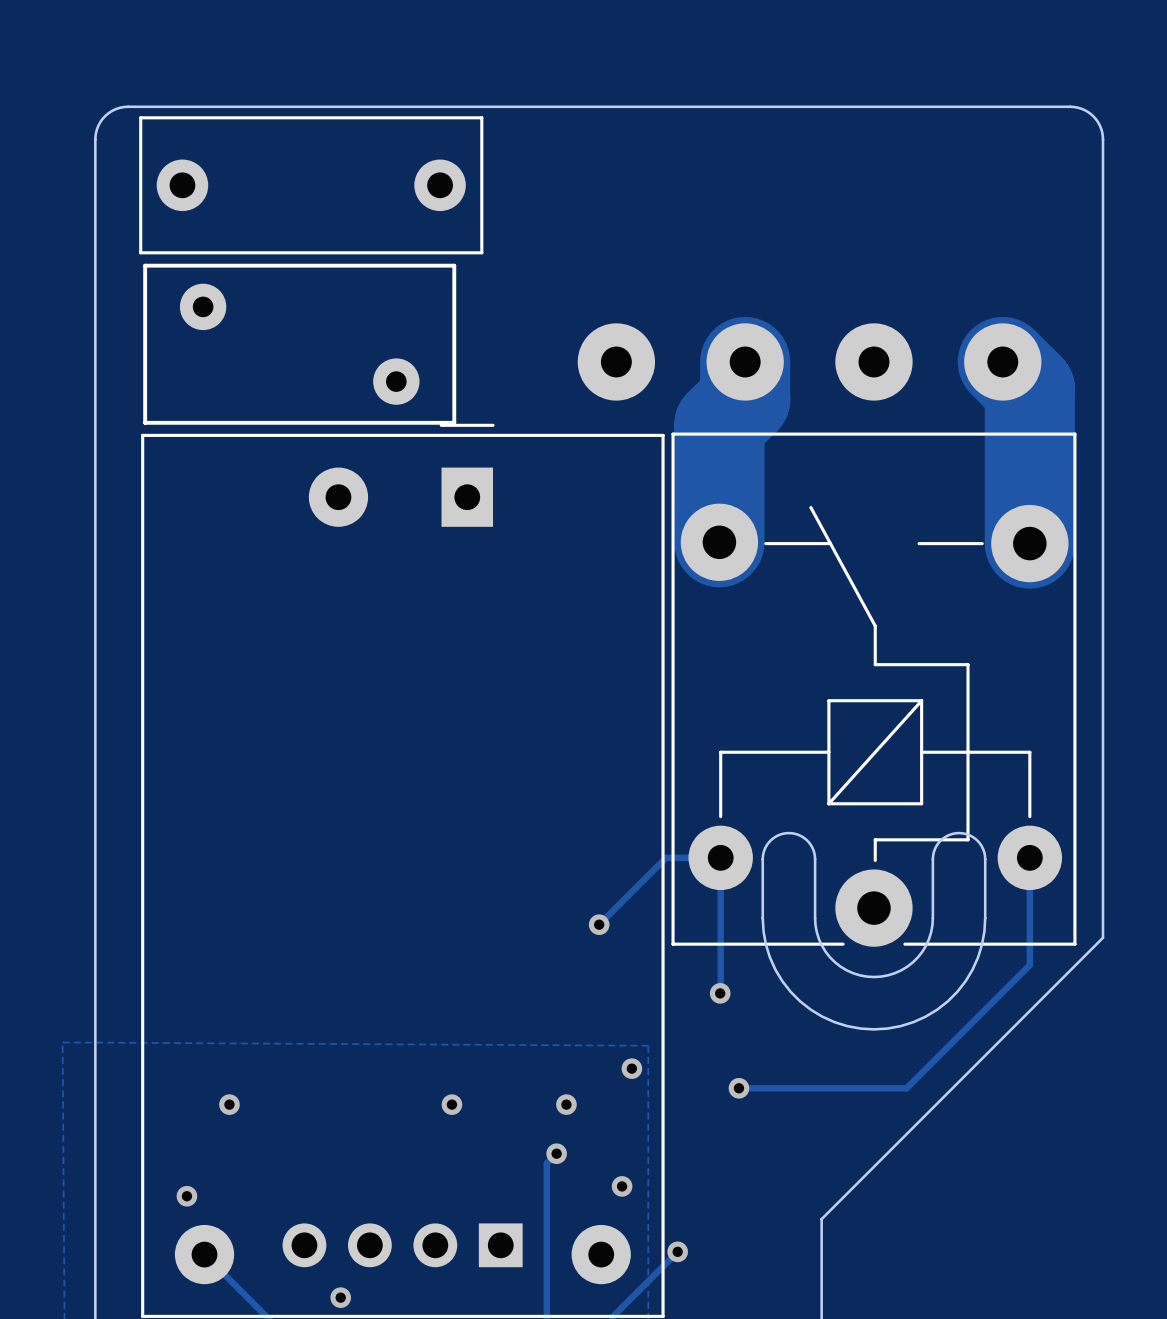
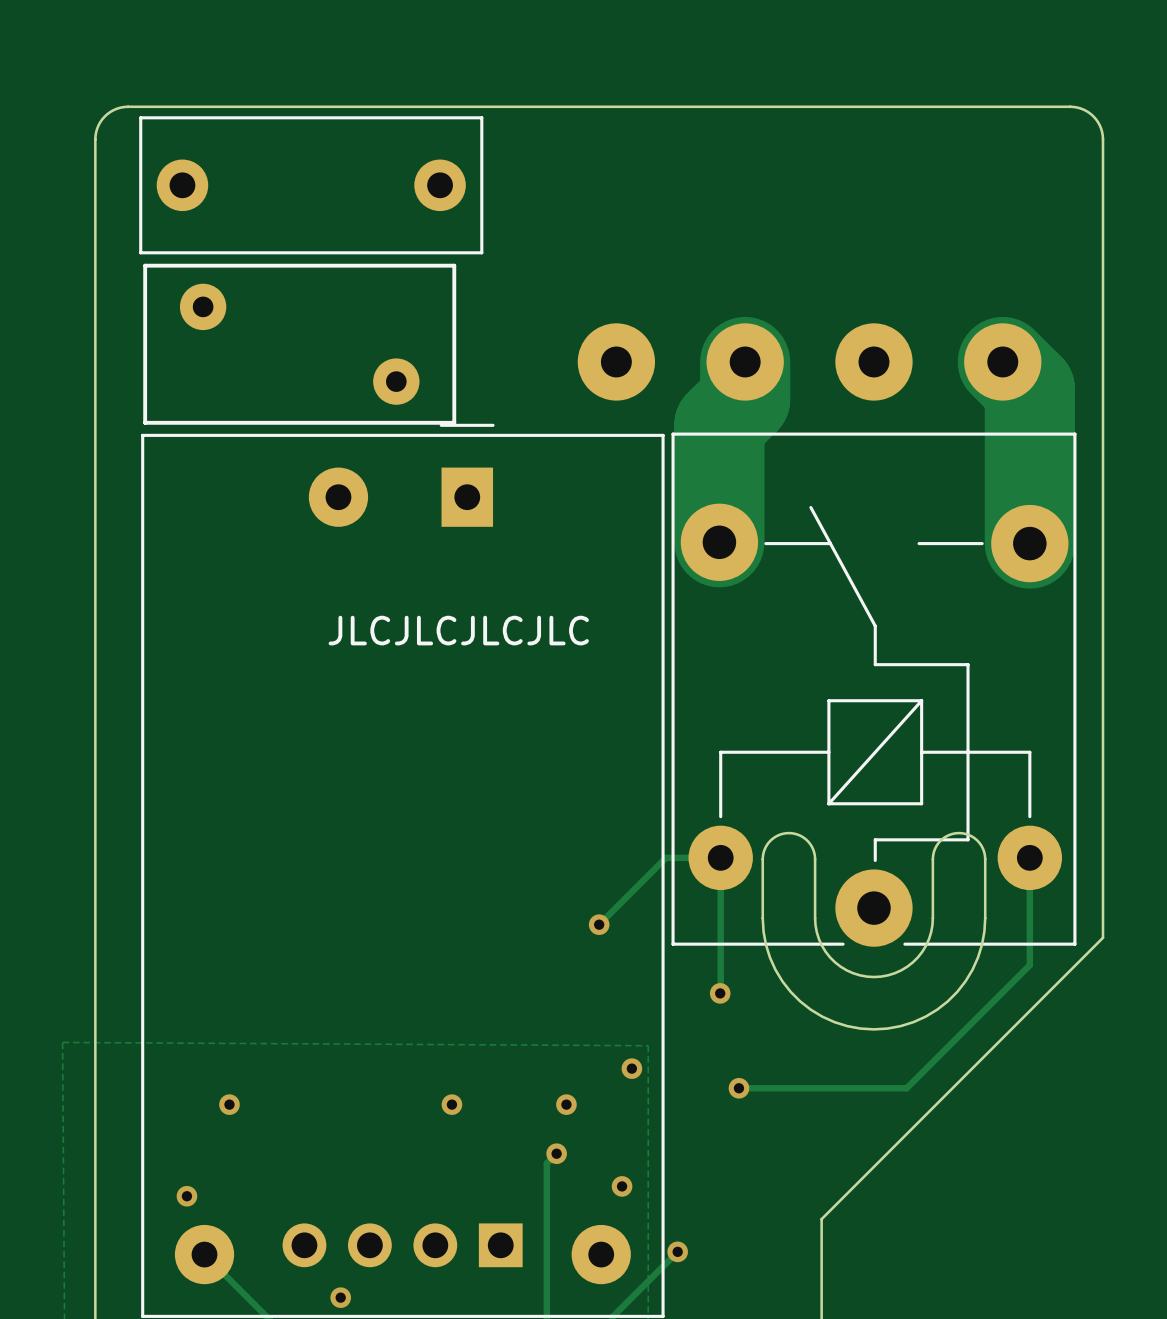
text: none -> JLCJLCJLCJLC (458, 630)

